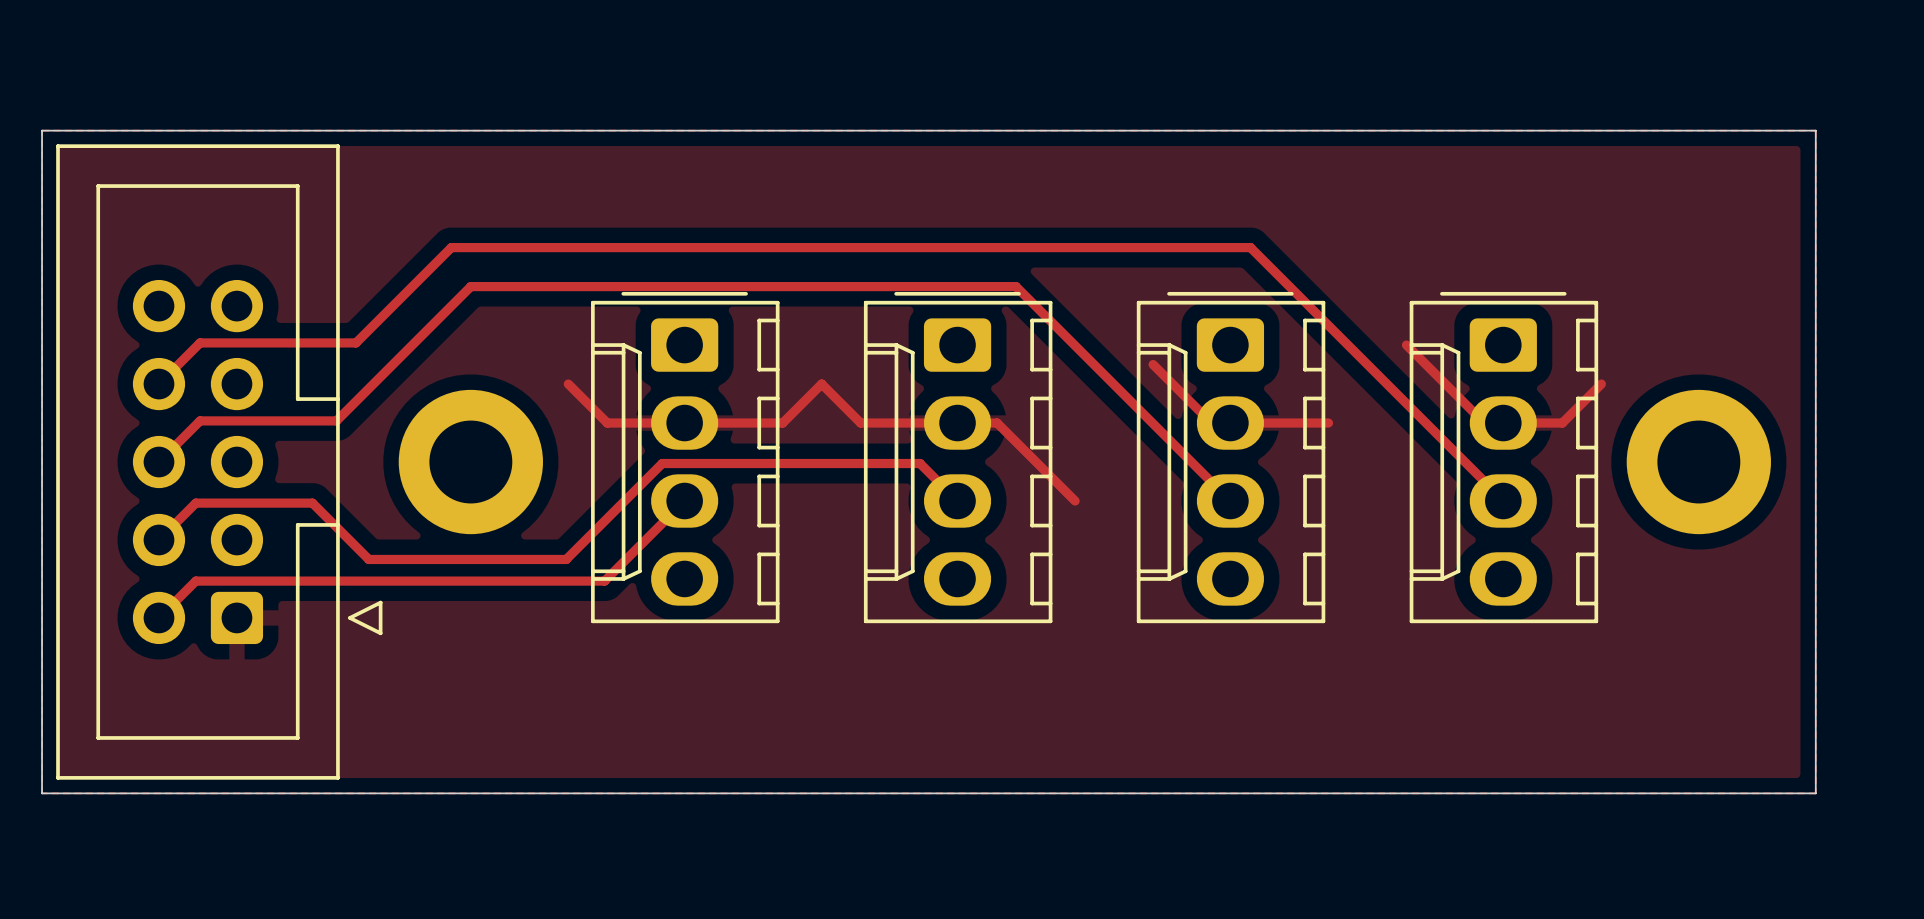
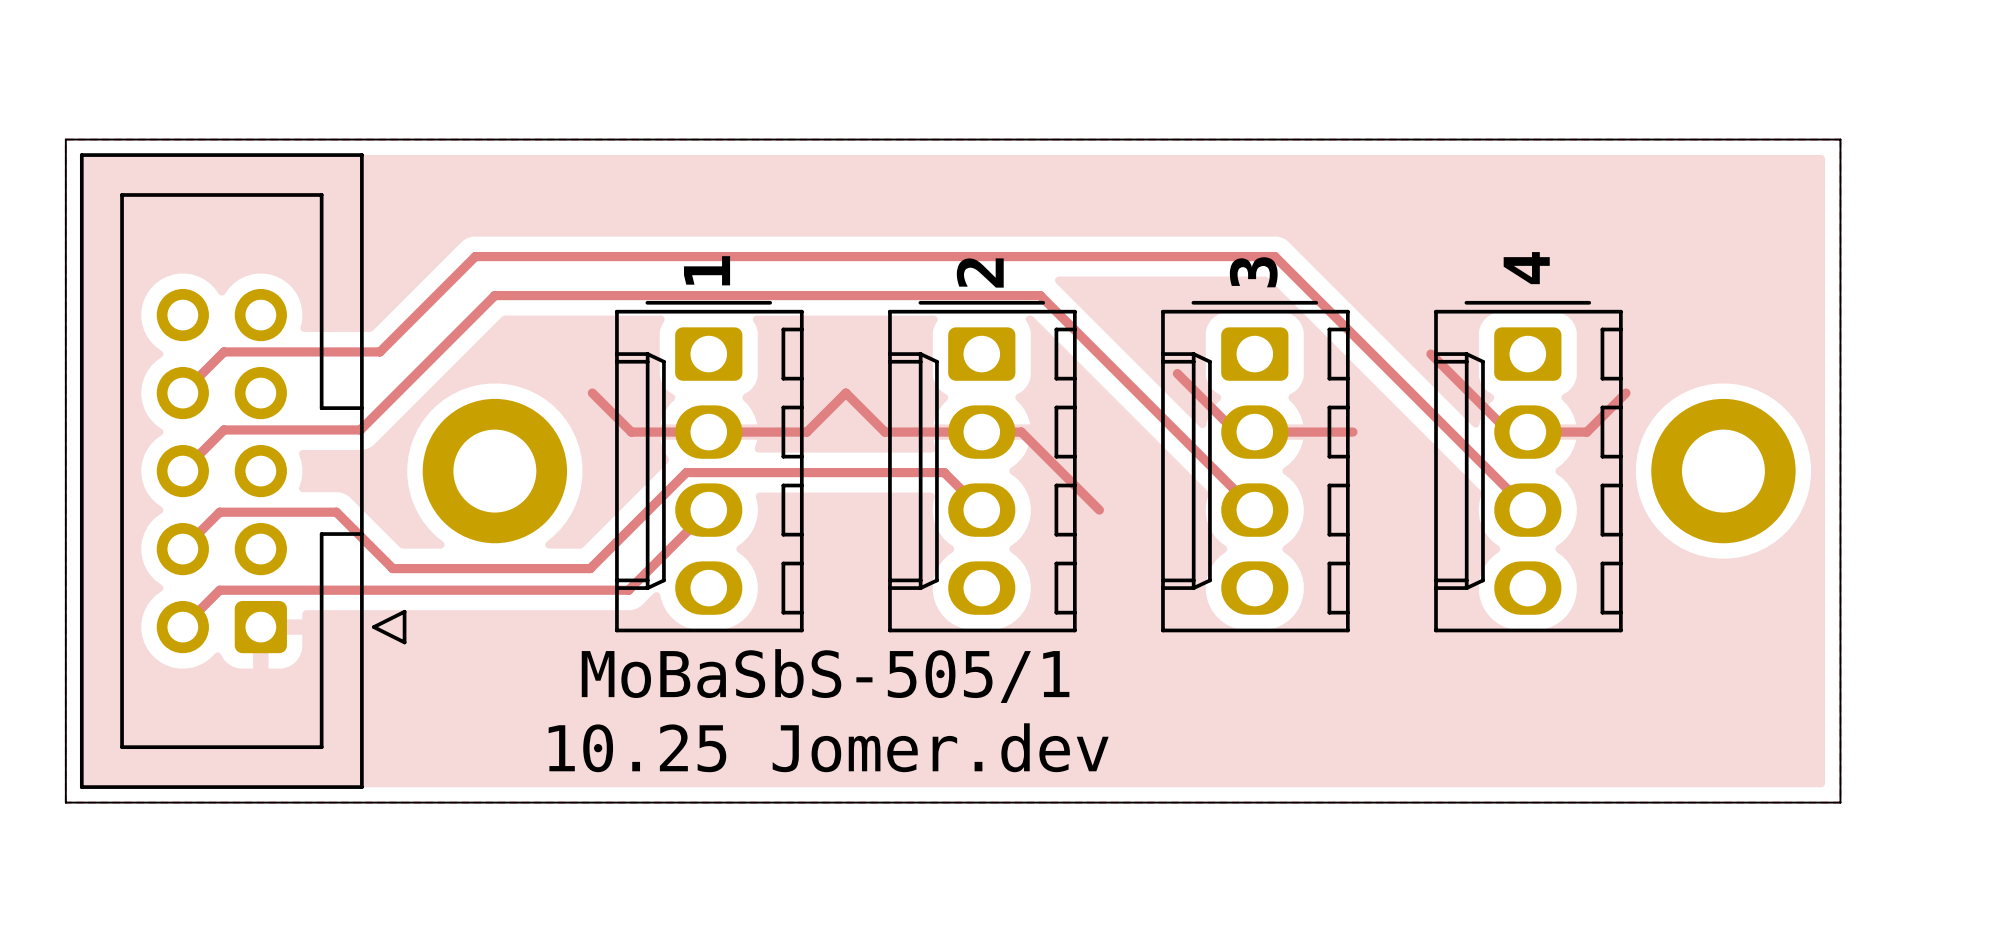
text: none -> 4 (1526, 268)
text: none -> 1 (707, 270)
text: none -> 2 (980, 273)
text: none -> 3 (1253, 272)
text: none -> MoBaSbS-505/1 (825, 676)
text: none -> 10.25 Jomer.dev (828, 747)

